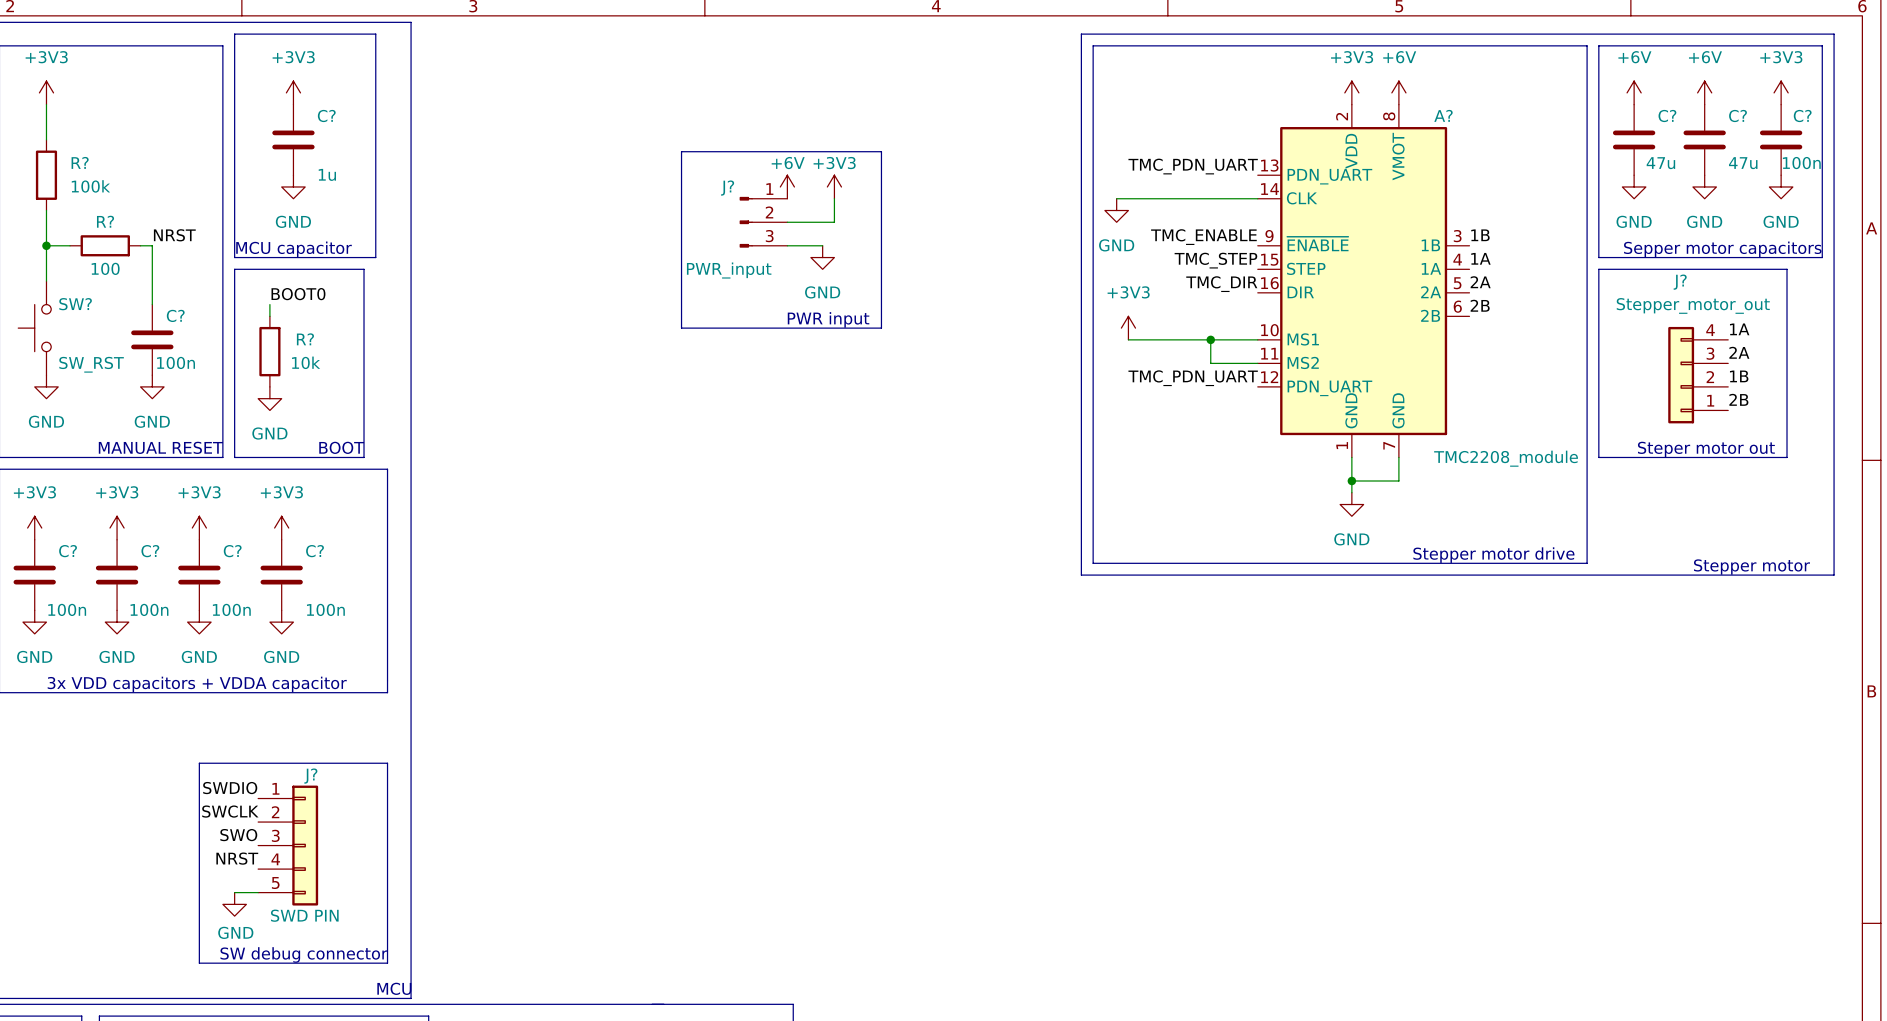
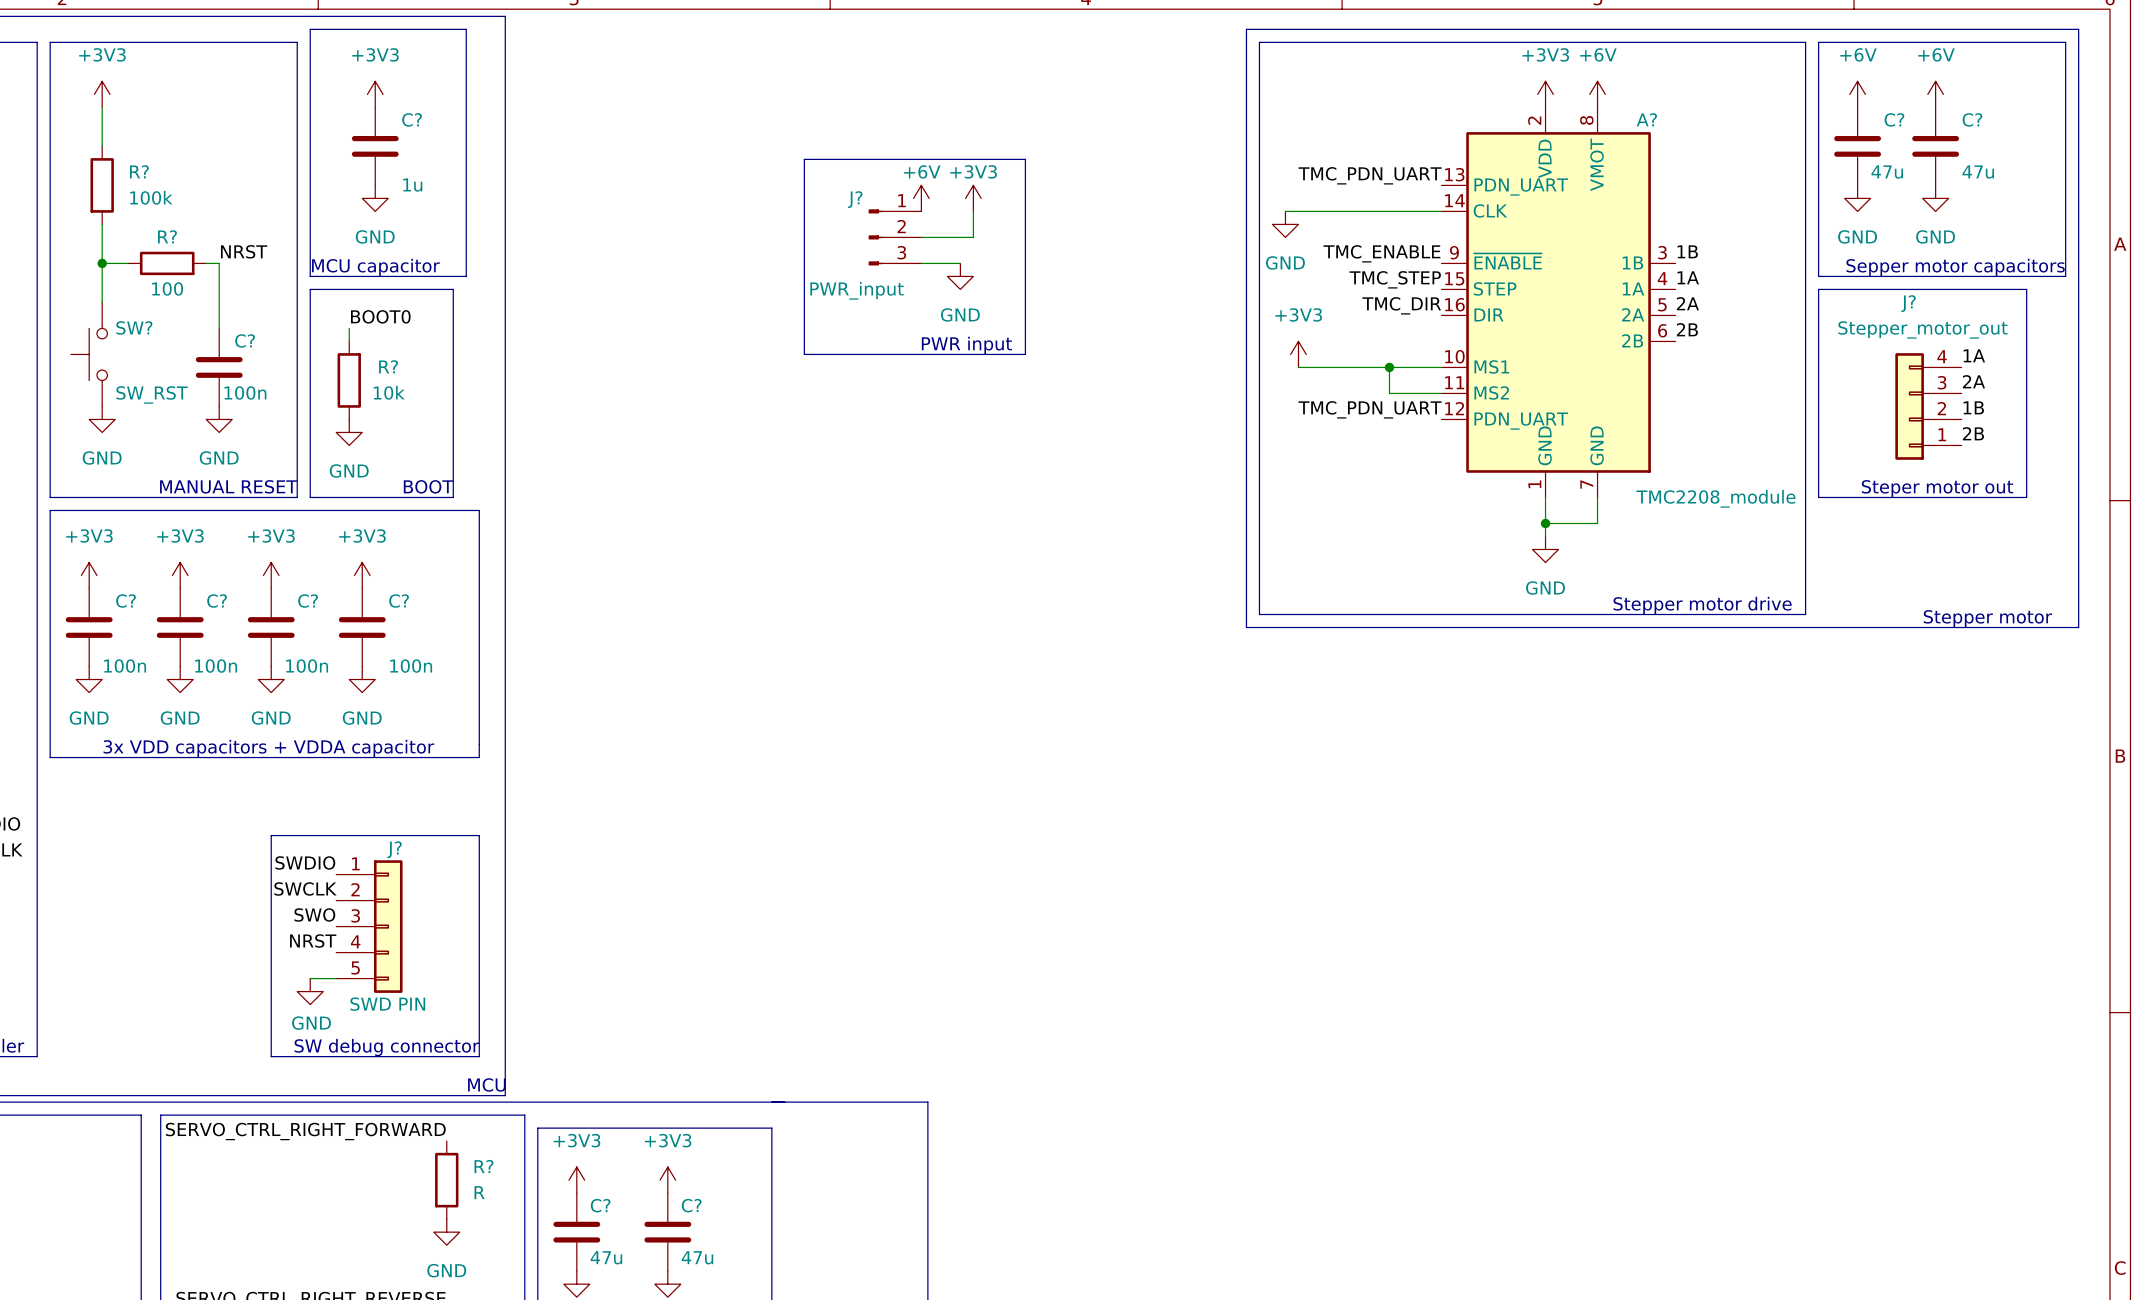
power symbol: +3V3 (1781, 92) -> none
C?: 100n (1781, 139) -> none
power symbol: GND (1781, 186) -> none

